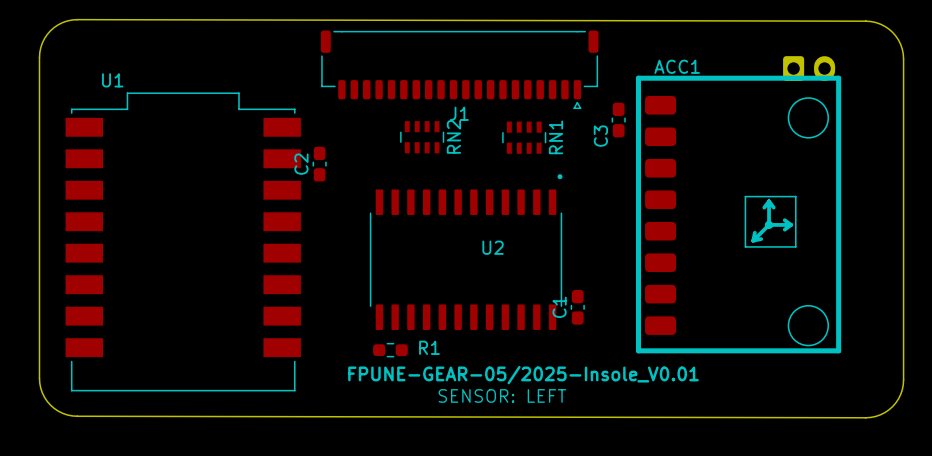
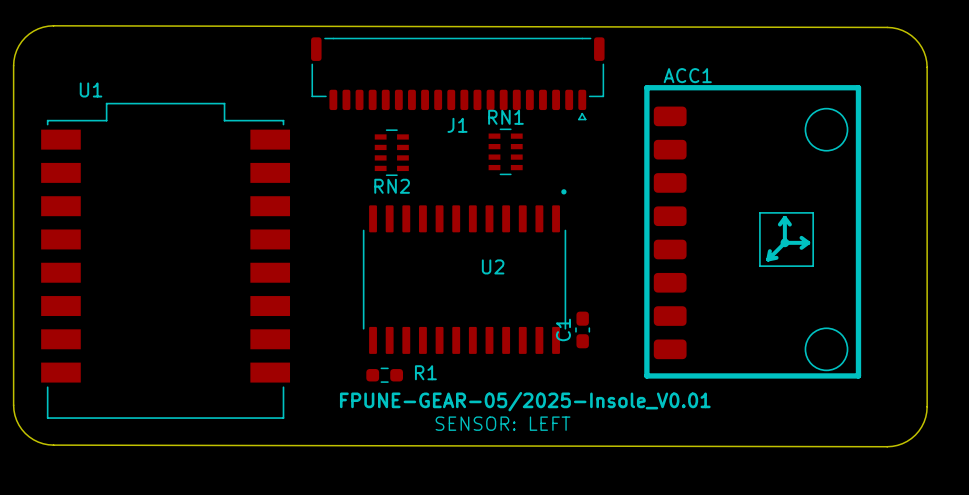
part: (809, 68) -> none
C3: (618, 120) -> none
RN2 rotation: 0° (422, 137) -> 90° clockwise (391, 152)
RN1 rotation: 0° (524, 137) -> 90° clockwise (505, 151)
RN1 name position: RN1 (555, 137) -> RN1 (505, 117)
C2: (319, 164) -> none

